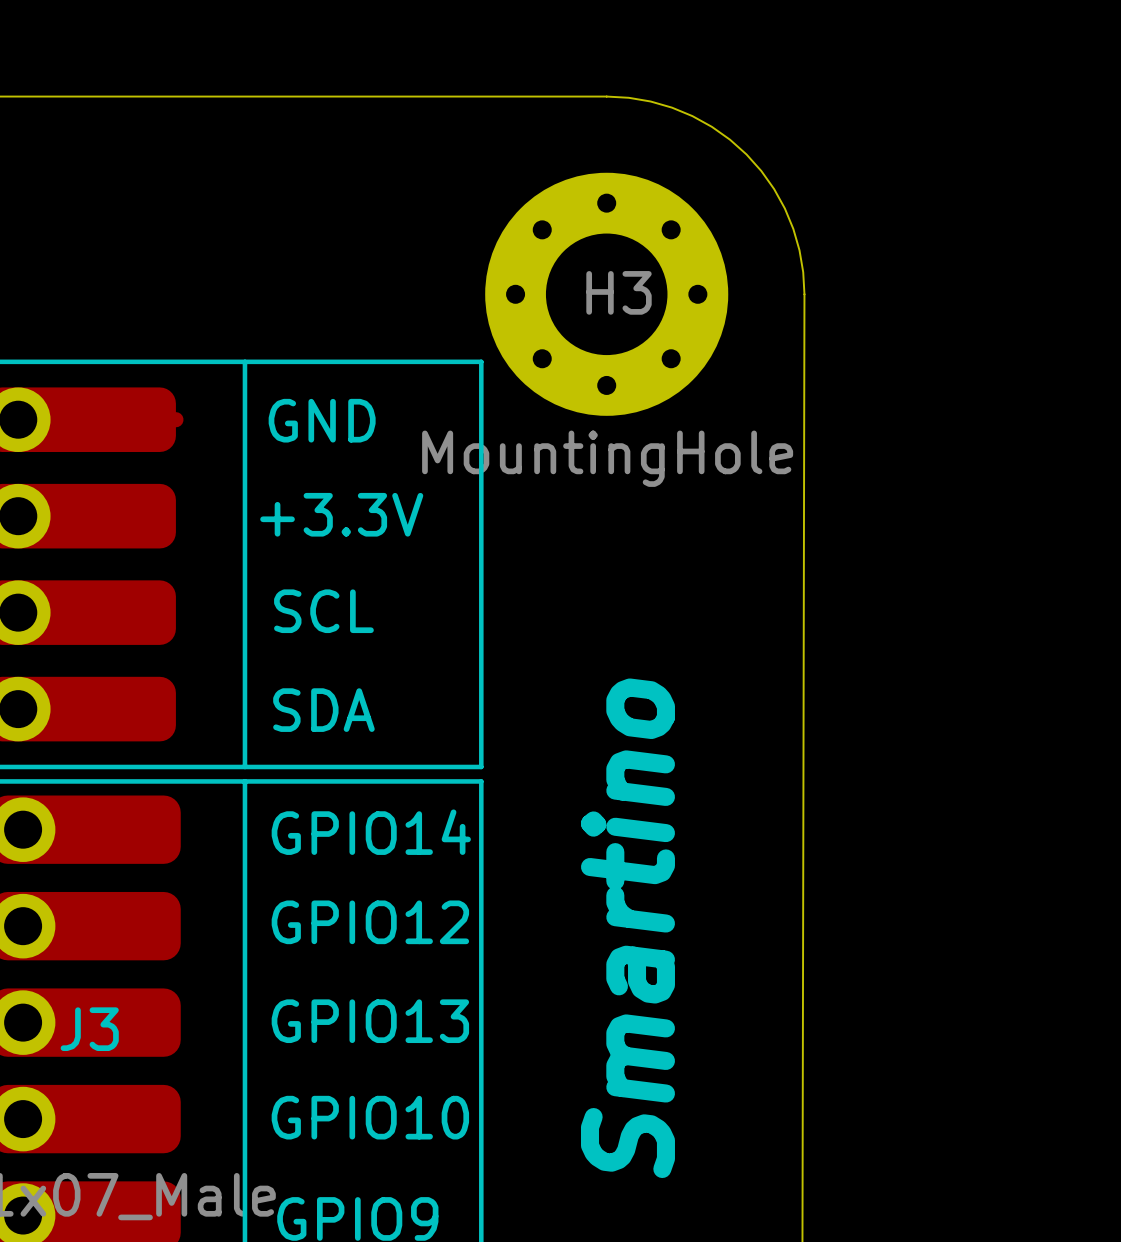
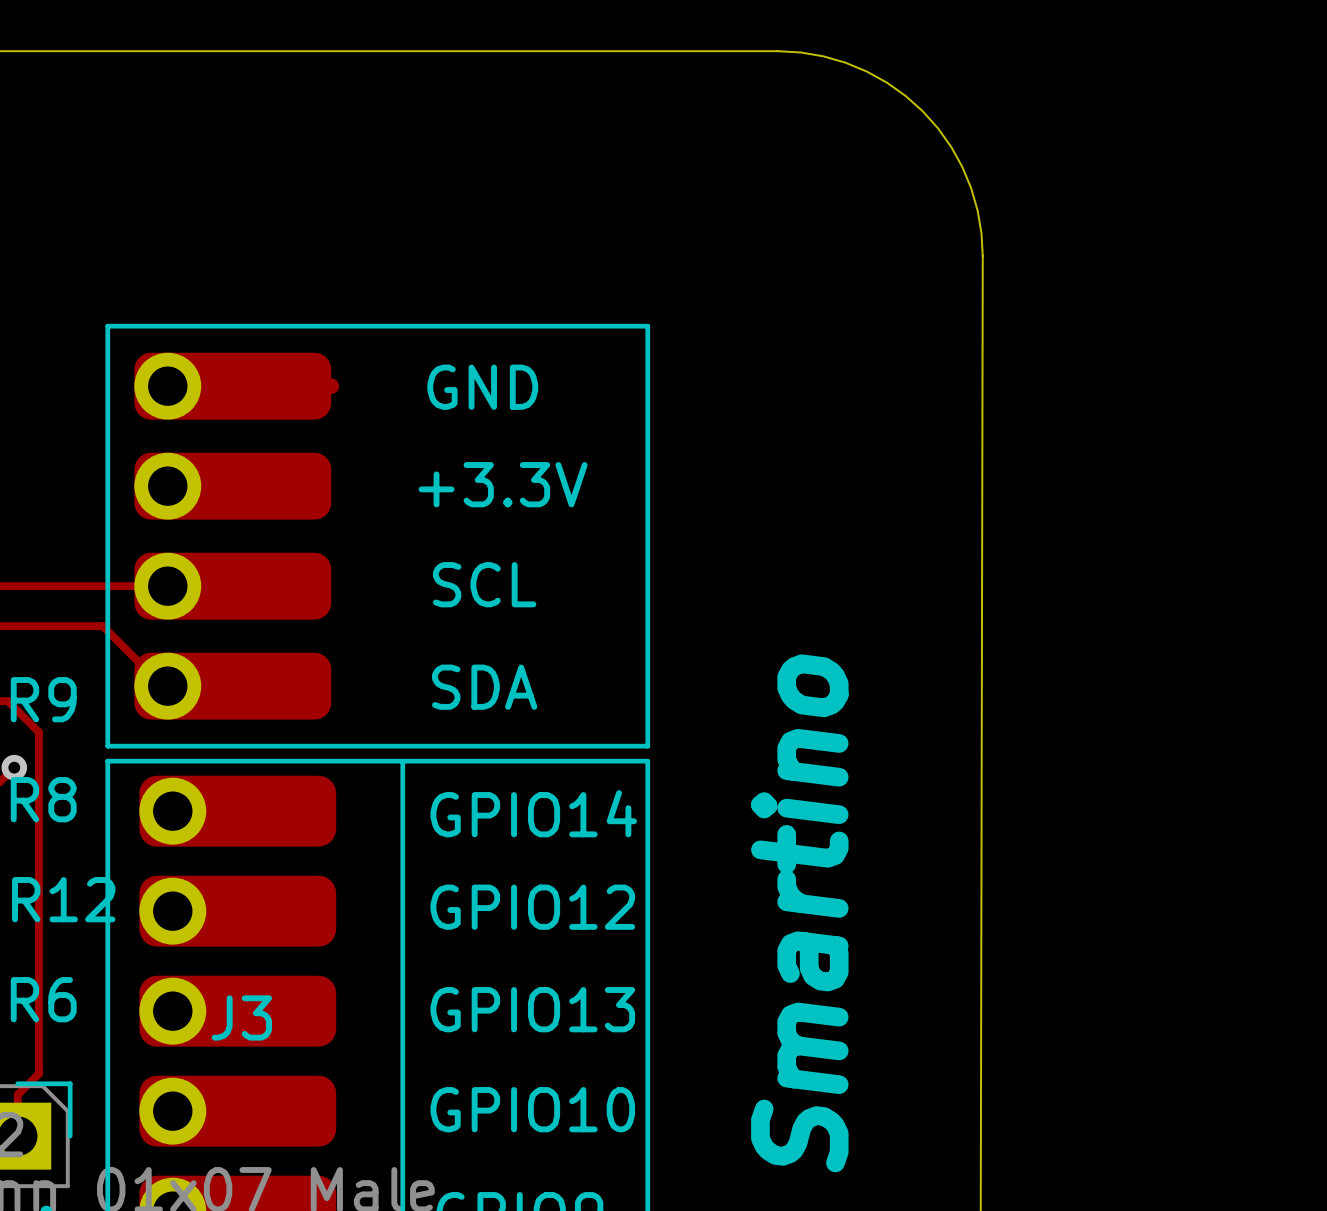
H3: MountingHole (606, 294) -> none
line: (244, 361) (244, 766) -> none

